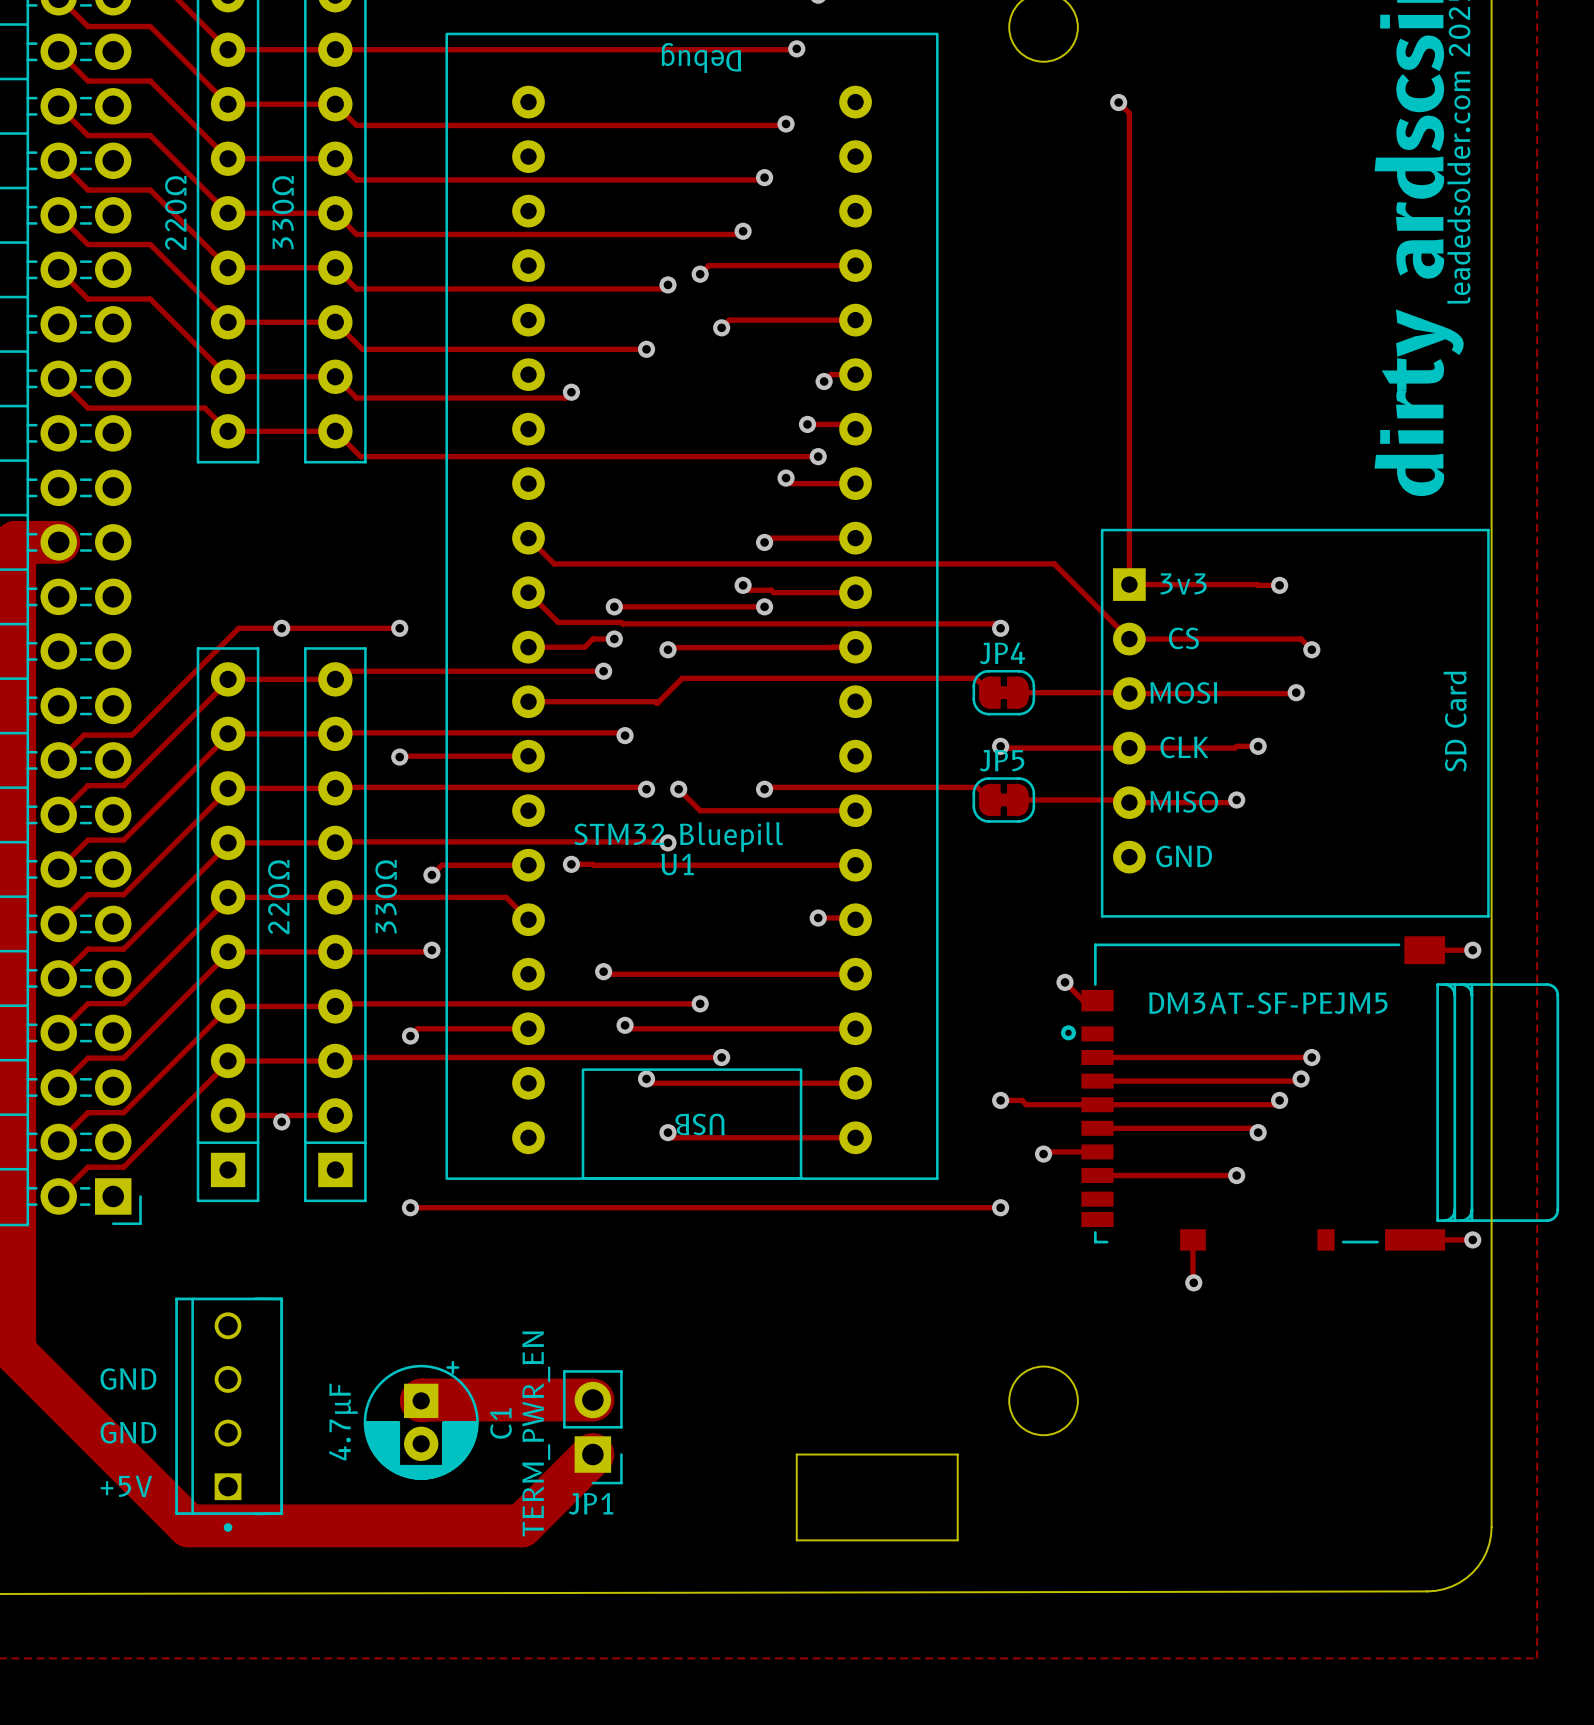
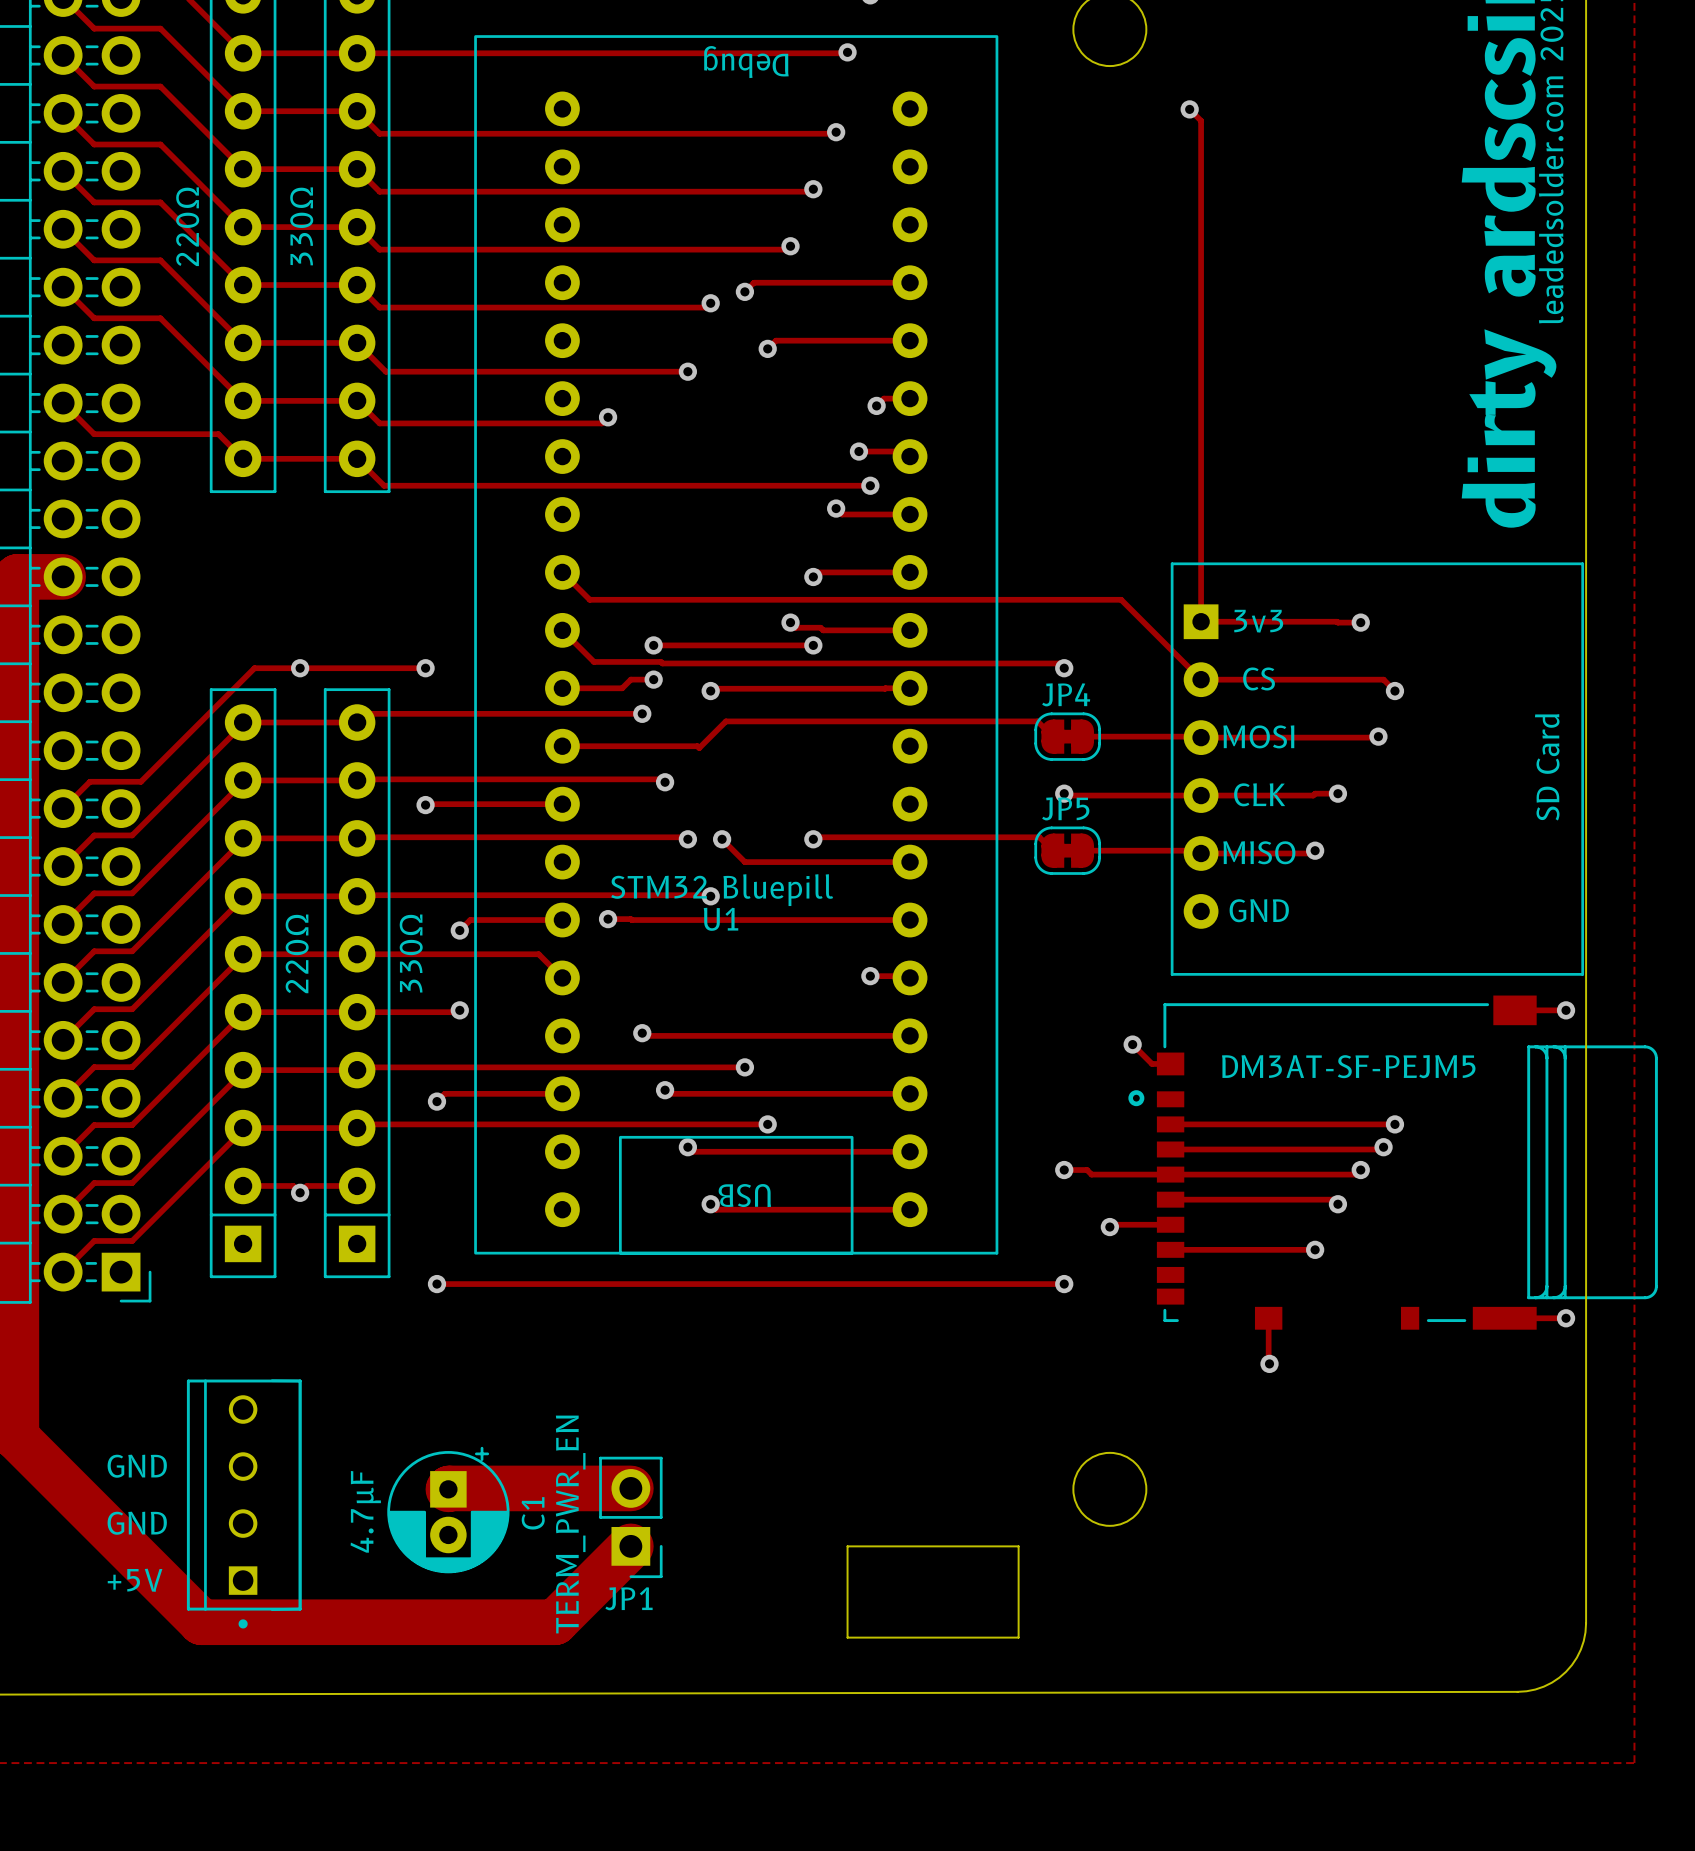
part footprint: [1060, 936, 1560, 1251] -> [1128, 995, 1658, 1330]

